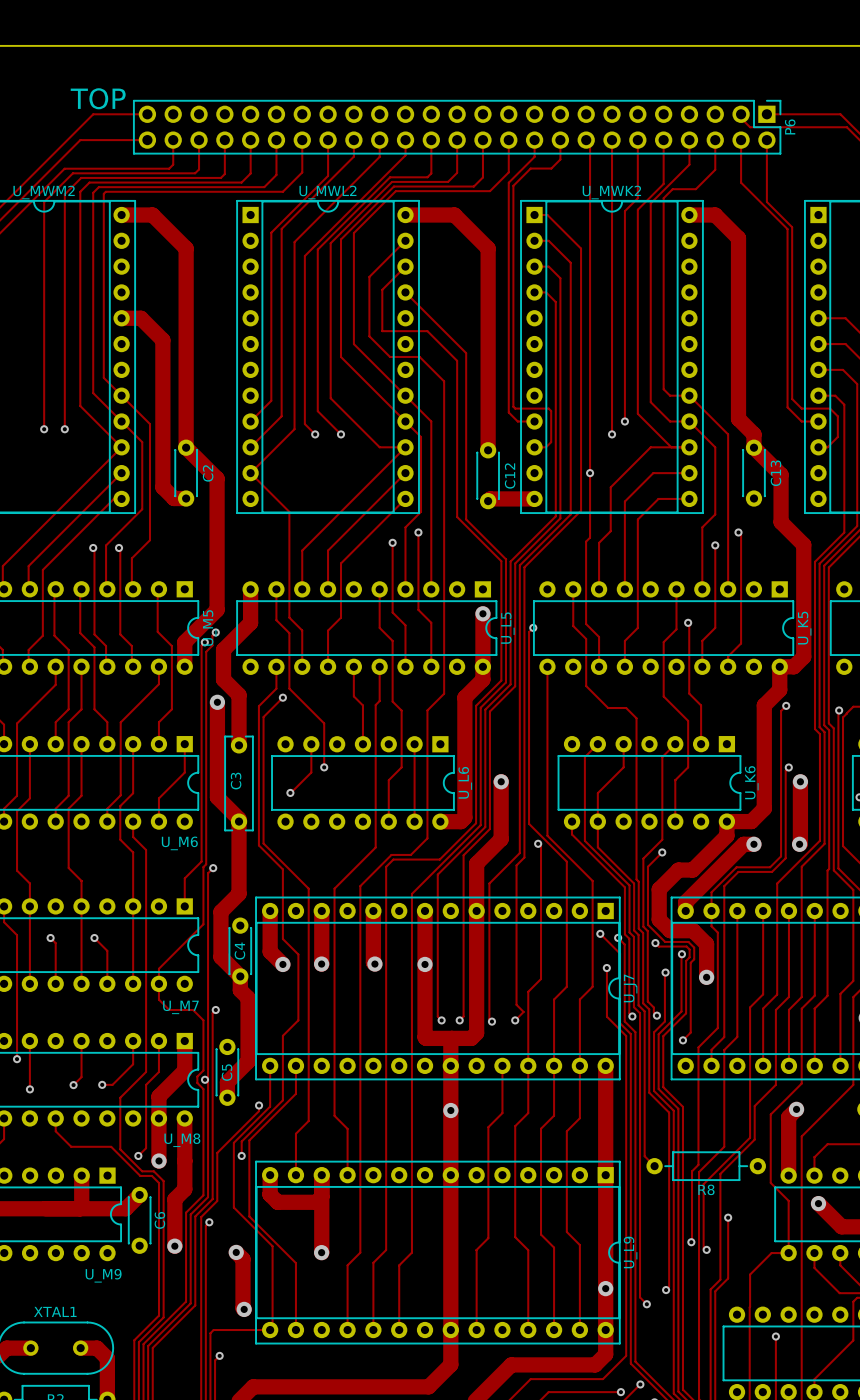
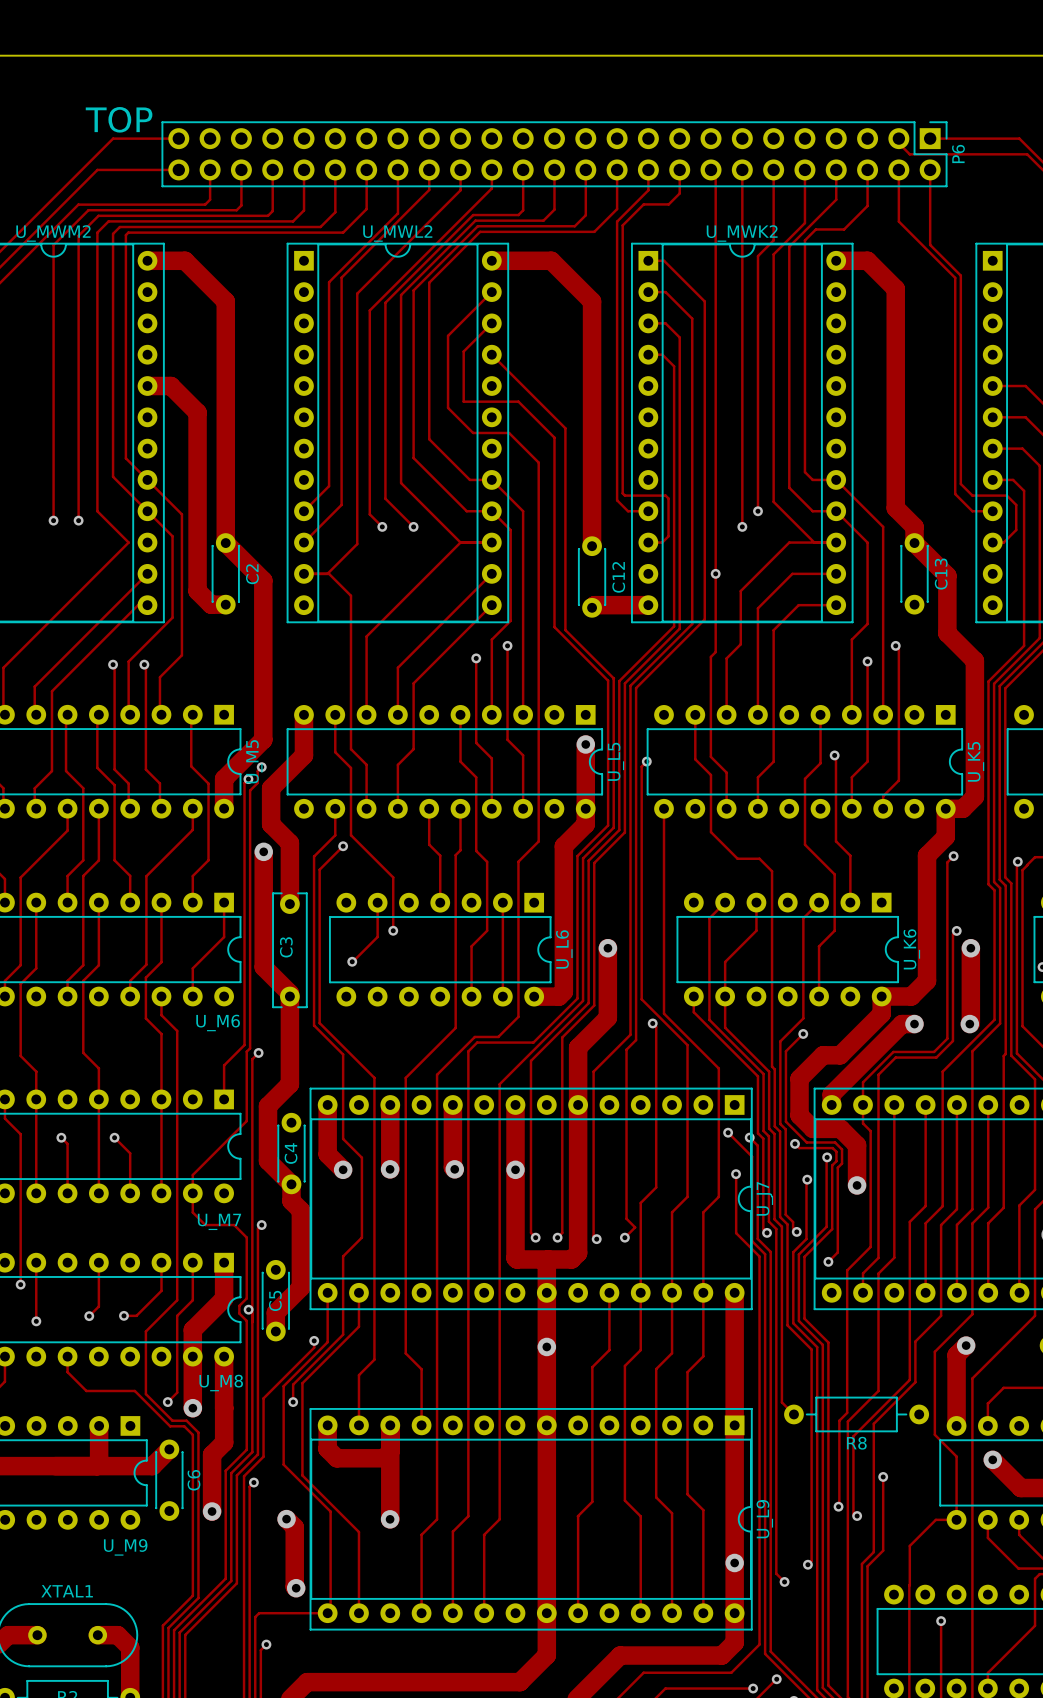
track: (353, 344) (405, 395) -> (429, 417) (429, 439) (469, 479) (491, 479)
track: (341, 357) (405, 421) -> (413, 433) (413, 458) (466, 511) (491, 511)
track: (80, 406) (121, 447) (2, 566) -> (97, 492) (97, 511) (128, 542) (3, 667) (3, 686)
track: (294, 429) (250, 473) (289, 511) -> (357, 520) (357, 544) (327, 573)
track: (405, 447) (302, 550) -> (460, 542) (366, 636) (366, 667)
track: none -> (303, 573) (329, 573) (350, 595) (350, 620)

